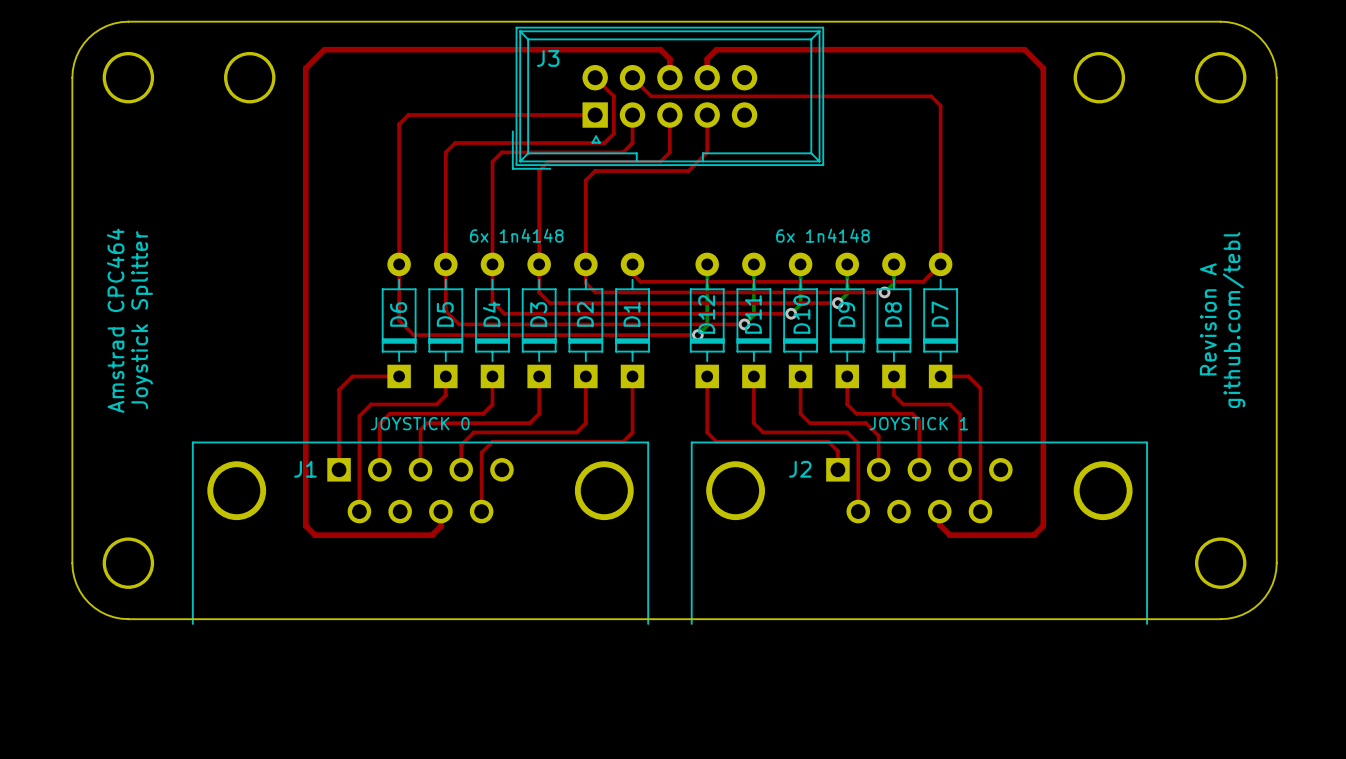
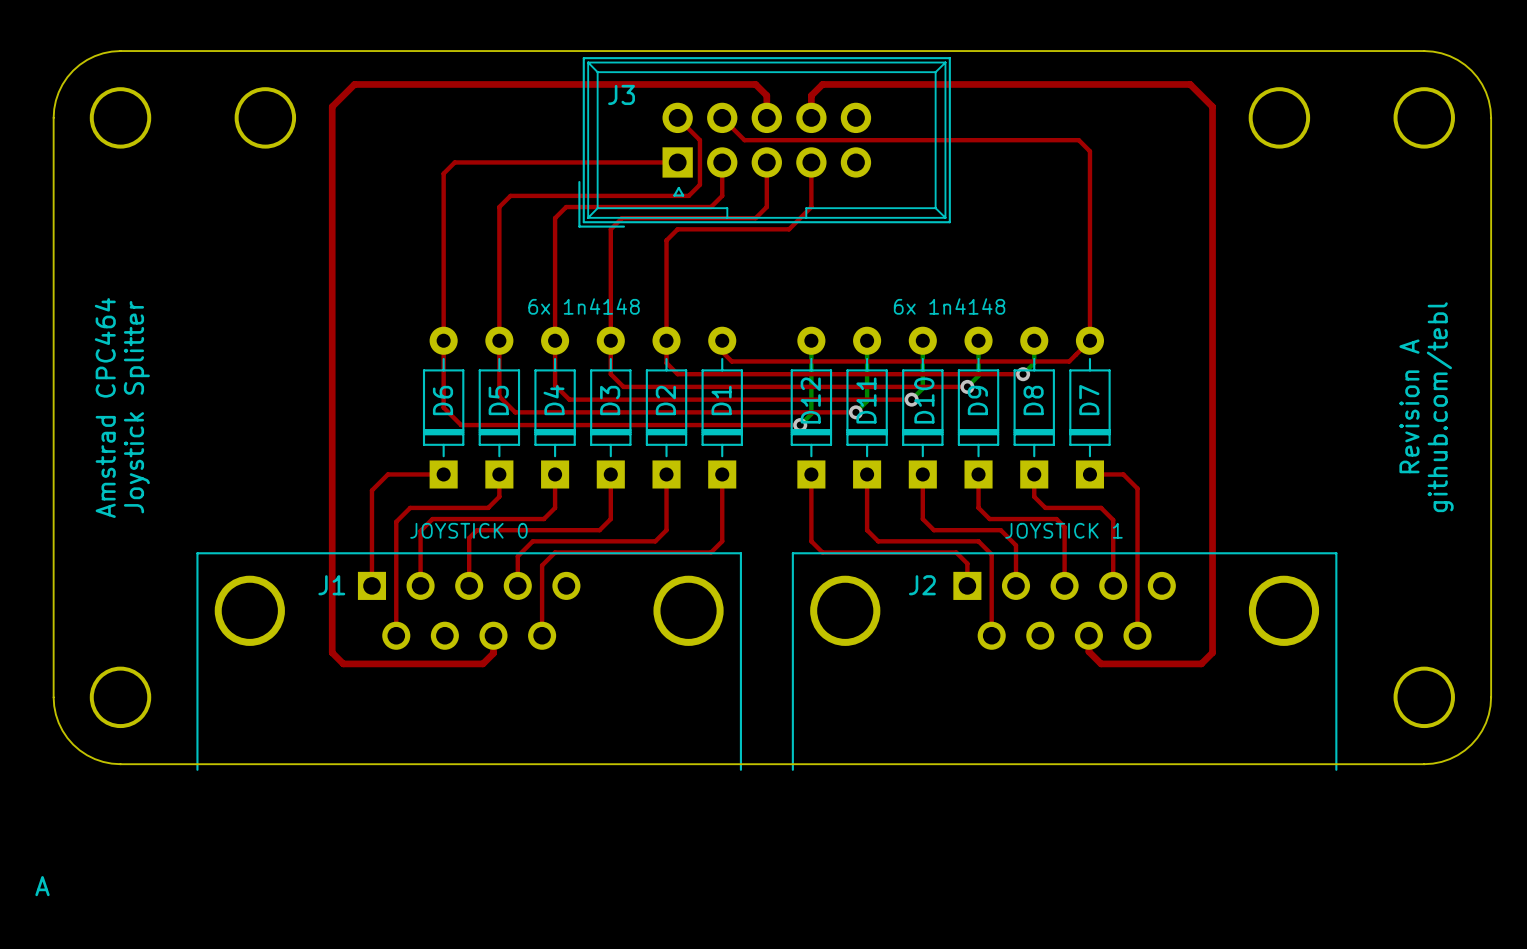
text: none -> A (42, 886)

